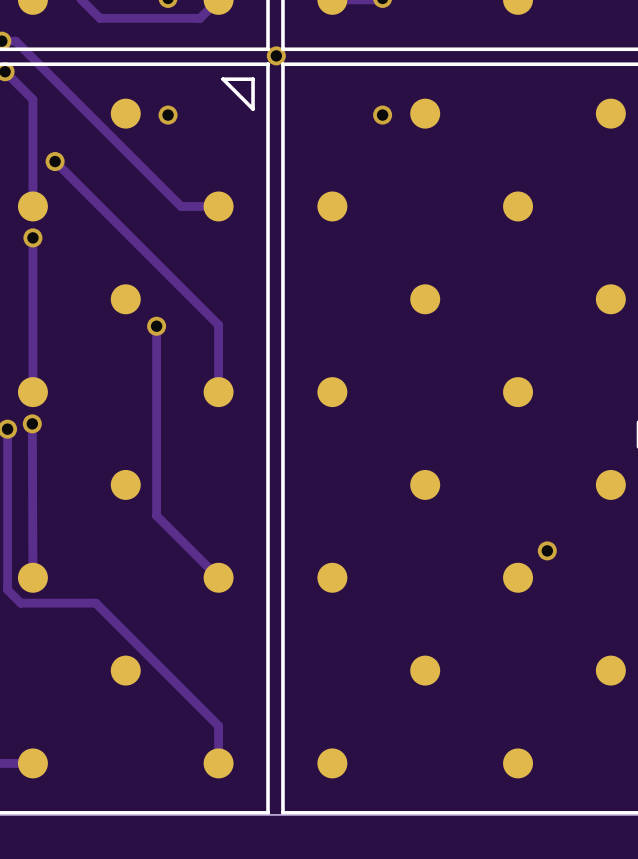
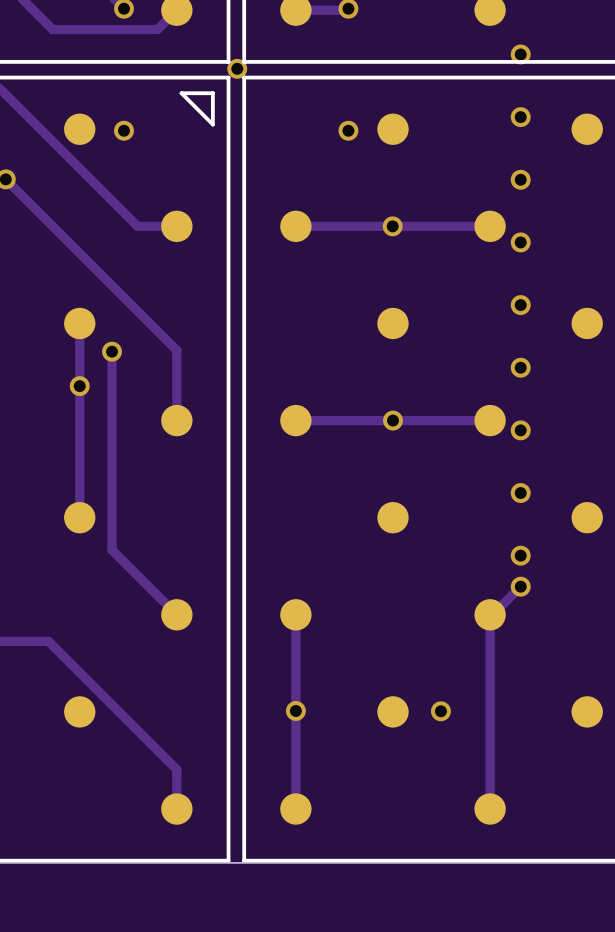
via: none -> (520, 54)
via: none -> (520, 117)
via: none -> (520, 179)
track: none -> (295, 226) (490, 226)
via: none -> (392, 226)
via: none -> (520, 242)
via: none -> (520, 305)
track: none -> (79, 323) (79, 517)
via: none -> (520, 367)
via: none -> (79, 386)
track: none -> (295, 420) (490, 420)
via: none -> (393, 420)
via: none -> (520, 430)
via: none -> (520, 493)
via: none -> (520, 555)
track: none -> (520, 586) (492, 614) (490, 614) (490, 809)
track: none -> (295, 614) (295, 809)
via: none -> (295, 710)
via: none -> (440, 711)

